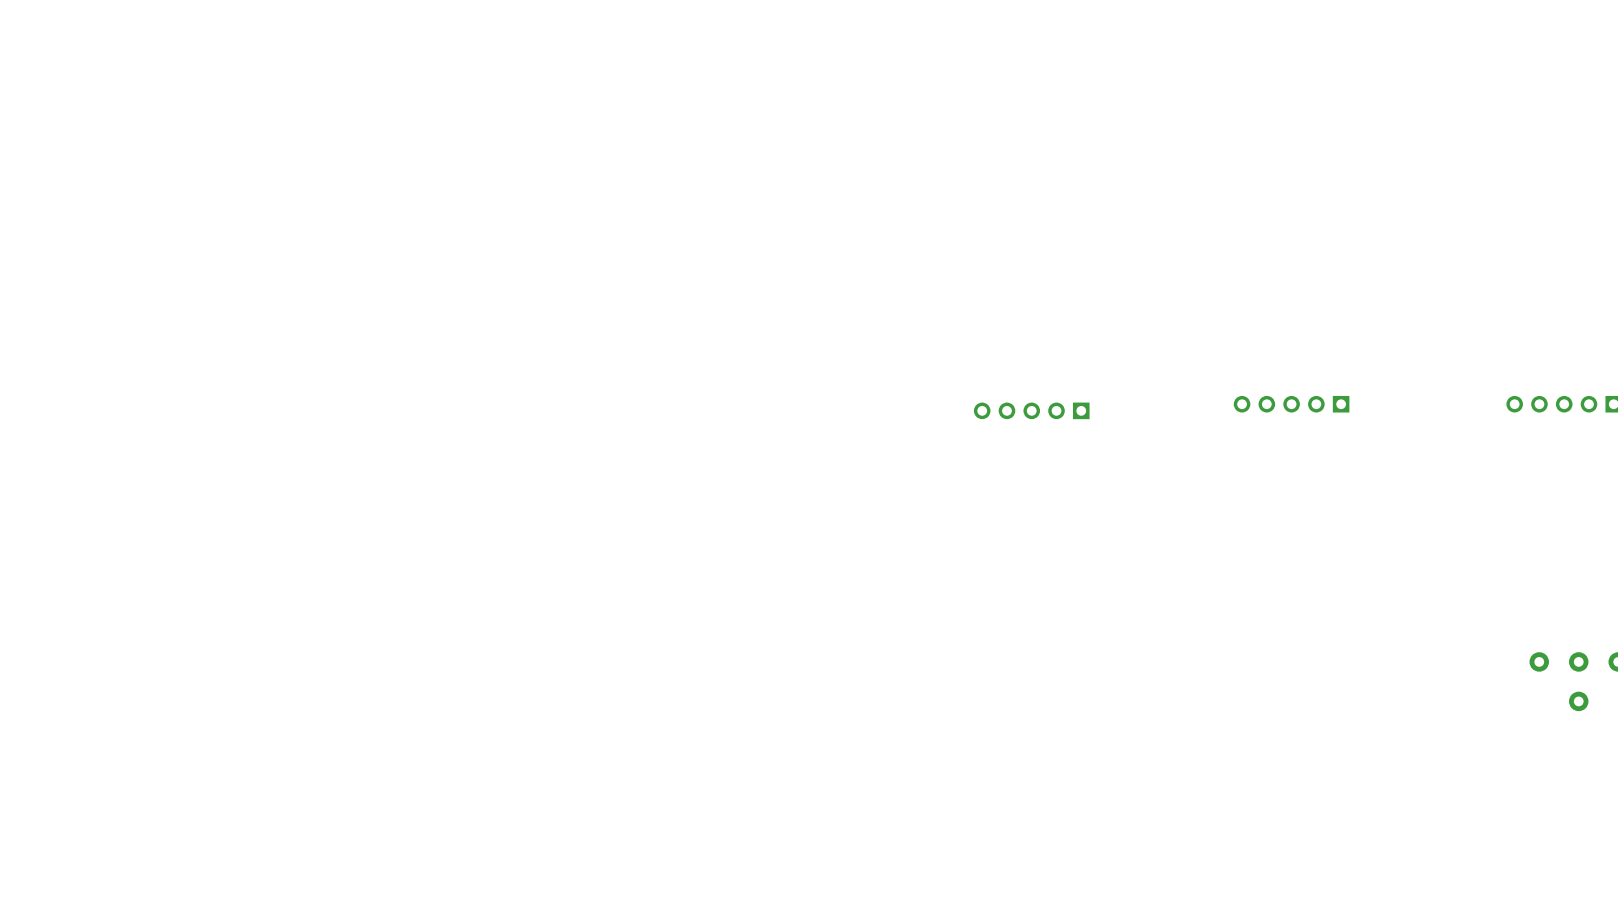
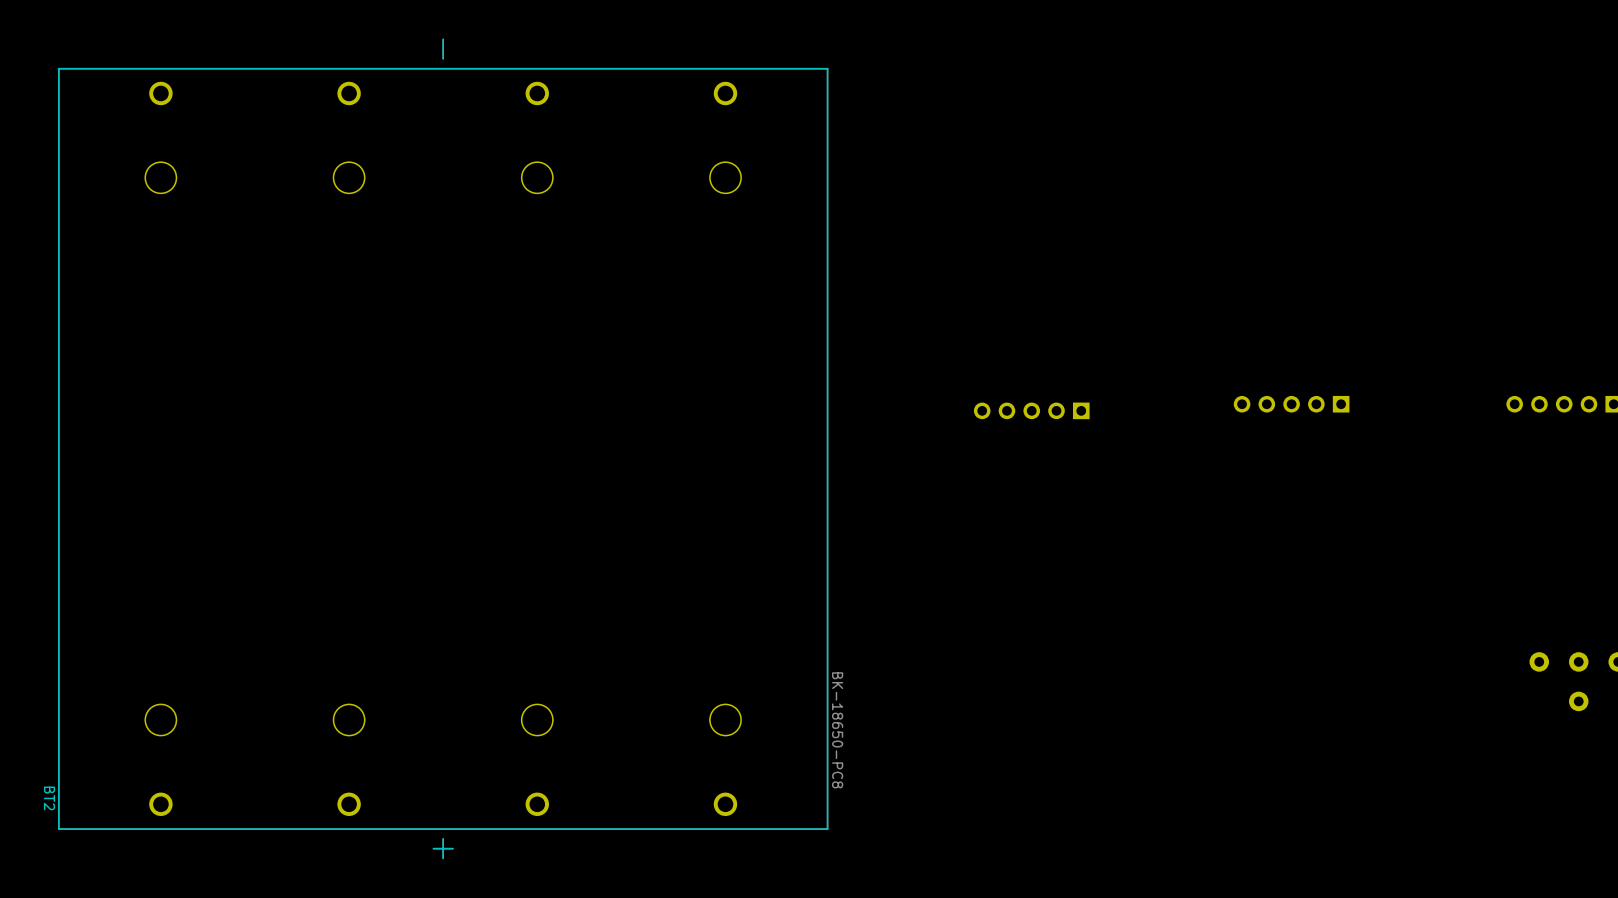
BT2: none -> BK-18650-PC8 (443, 448)

